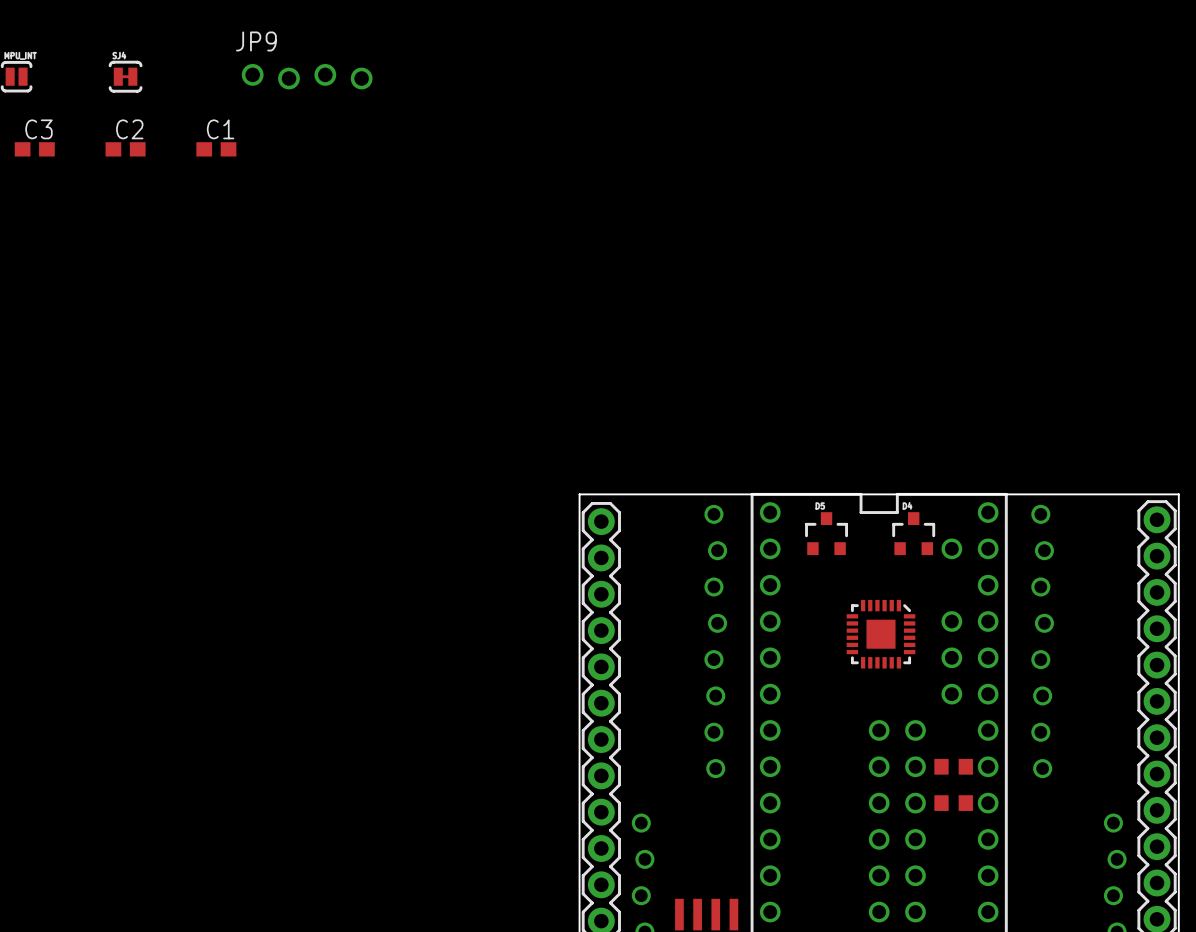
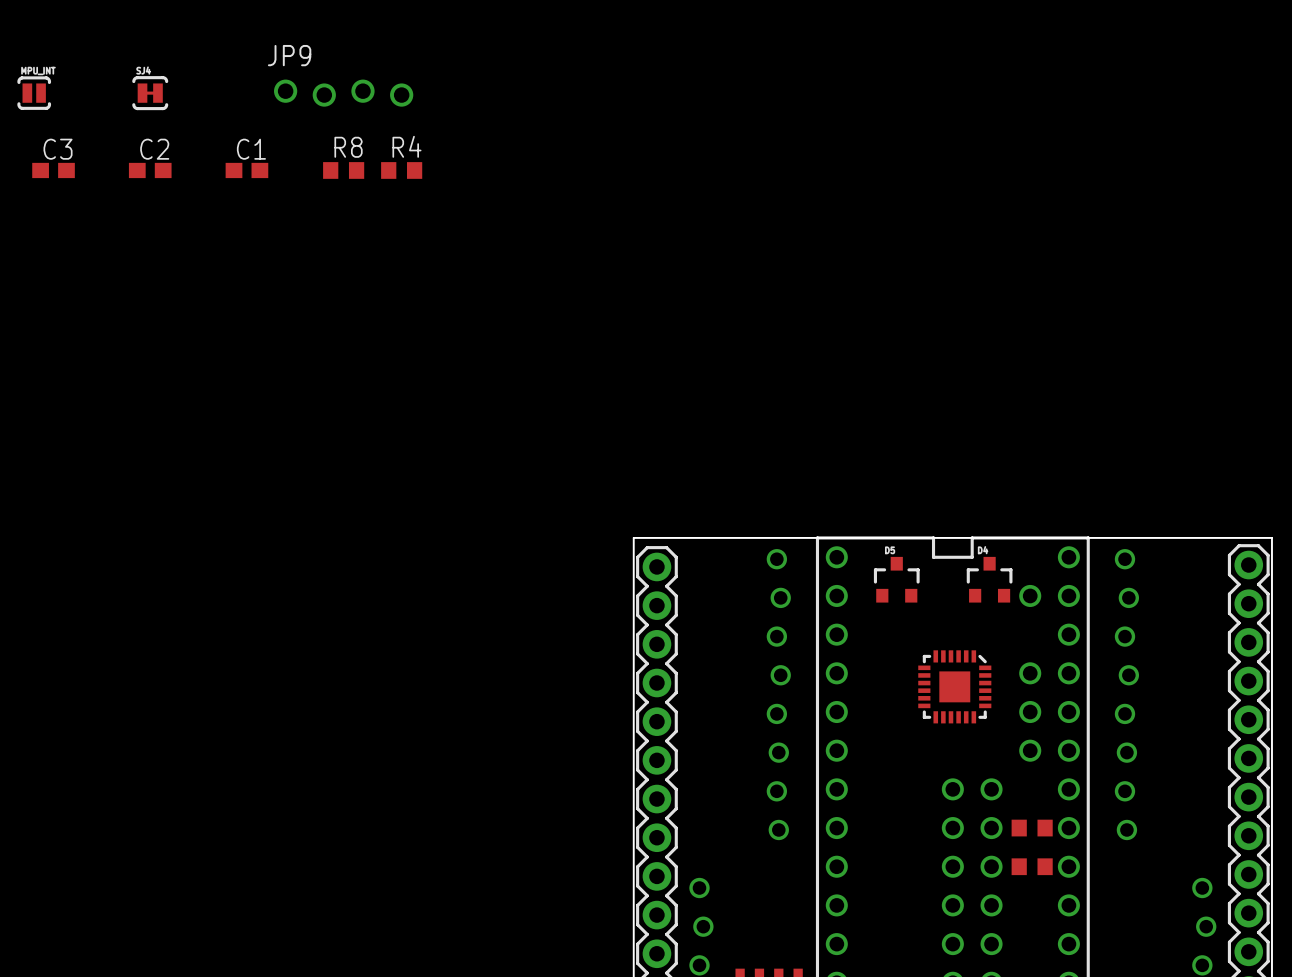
R8: none -> (343, 170)
R4: none -> (401, 170)

